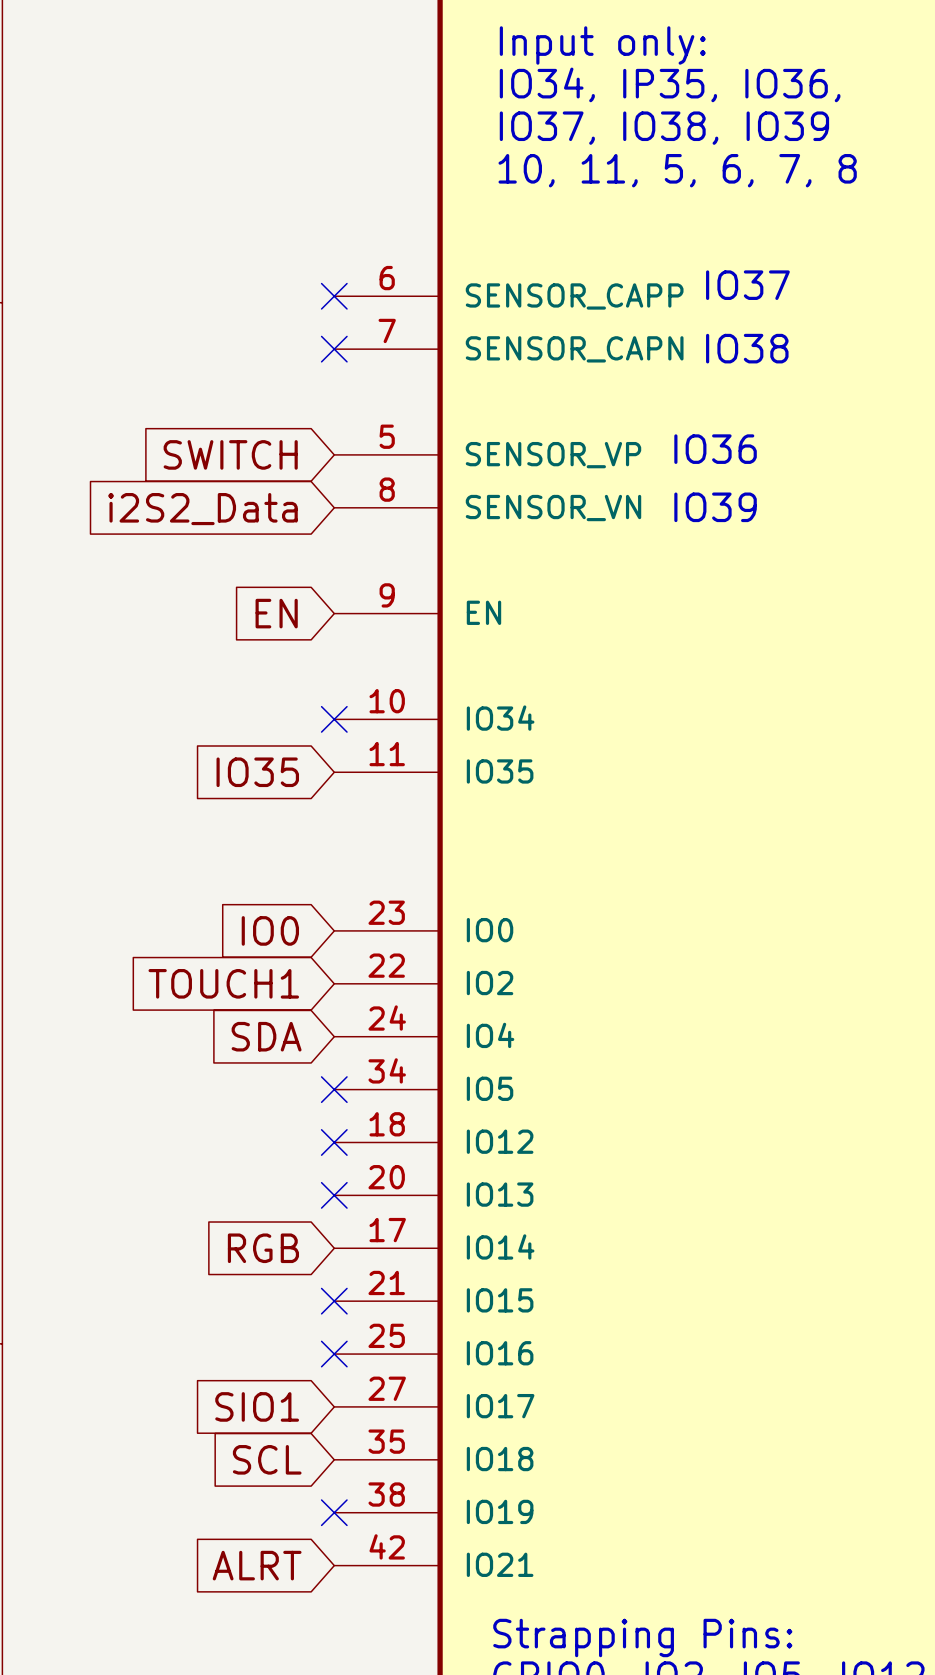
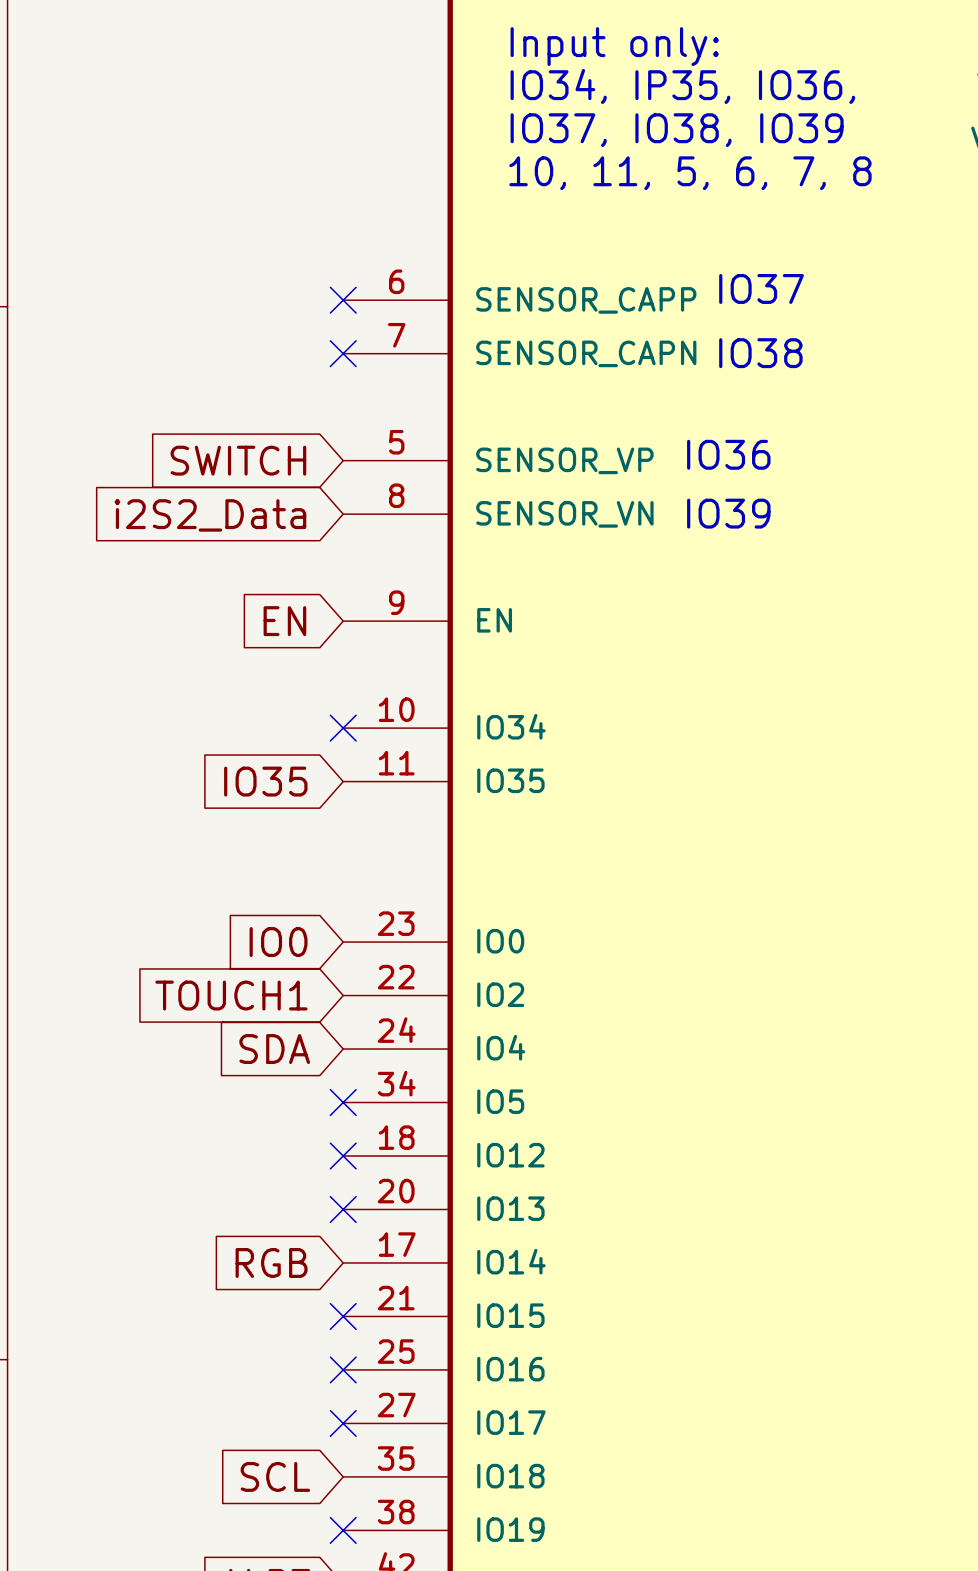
global label: SIO1 (257, 1406) -> none
no-connect mark: none -> (343, 1423)

